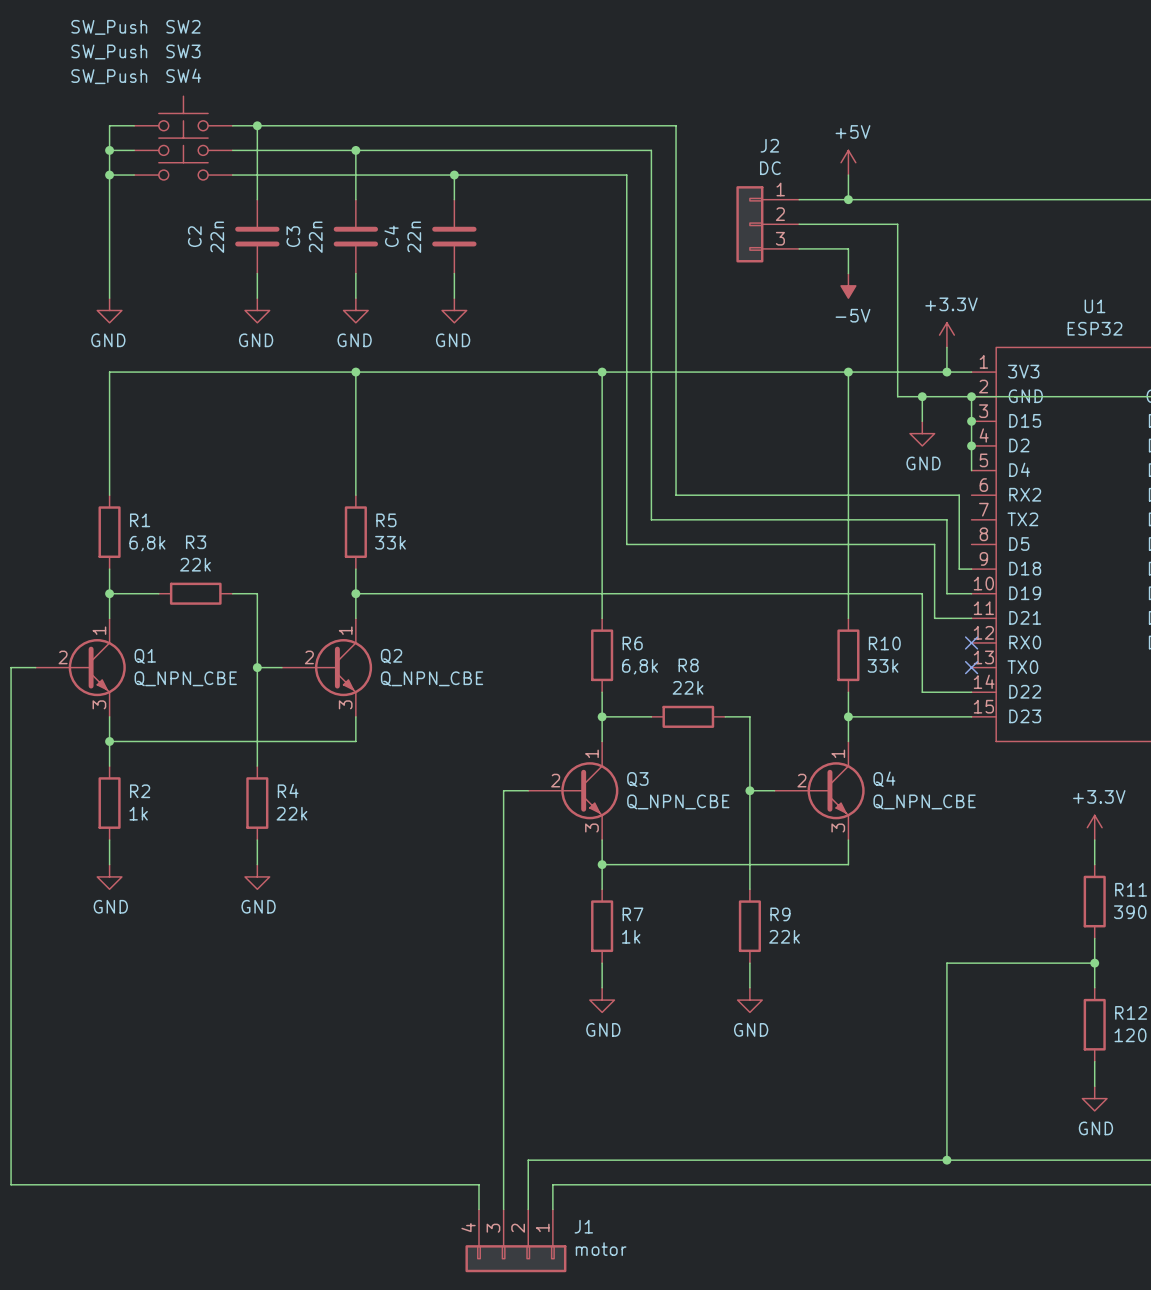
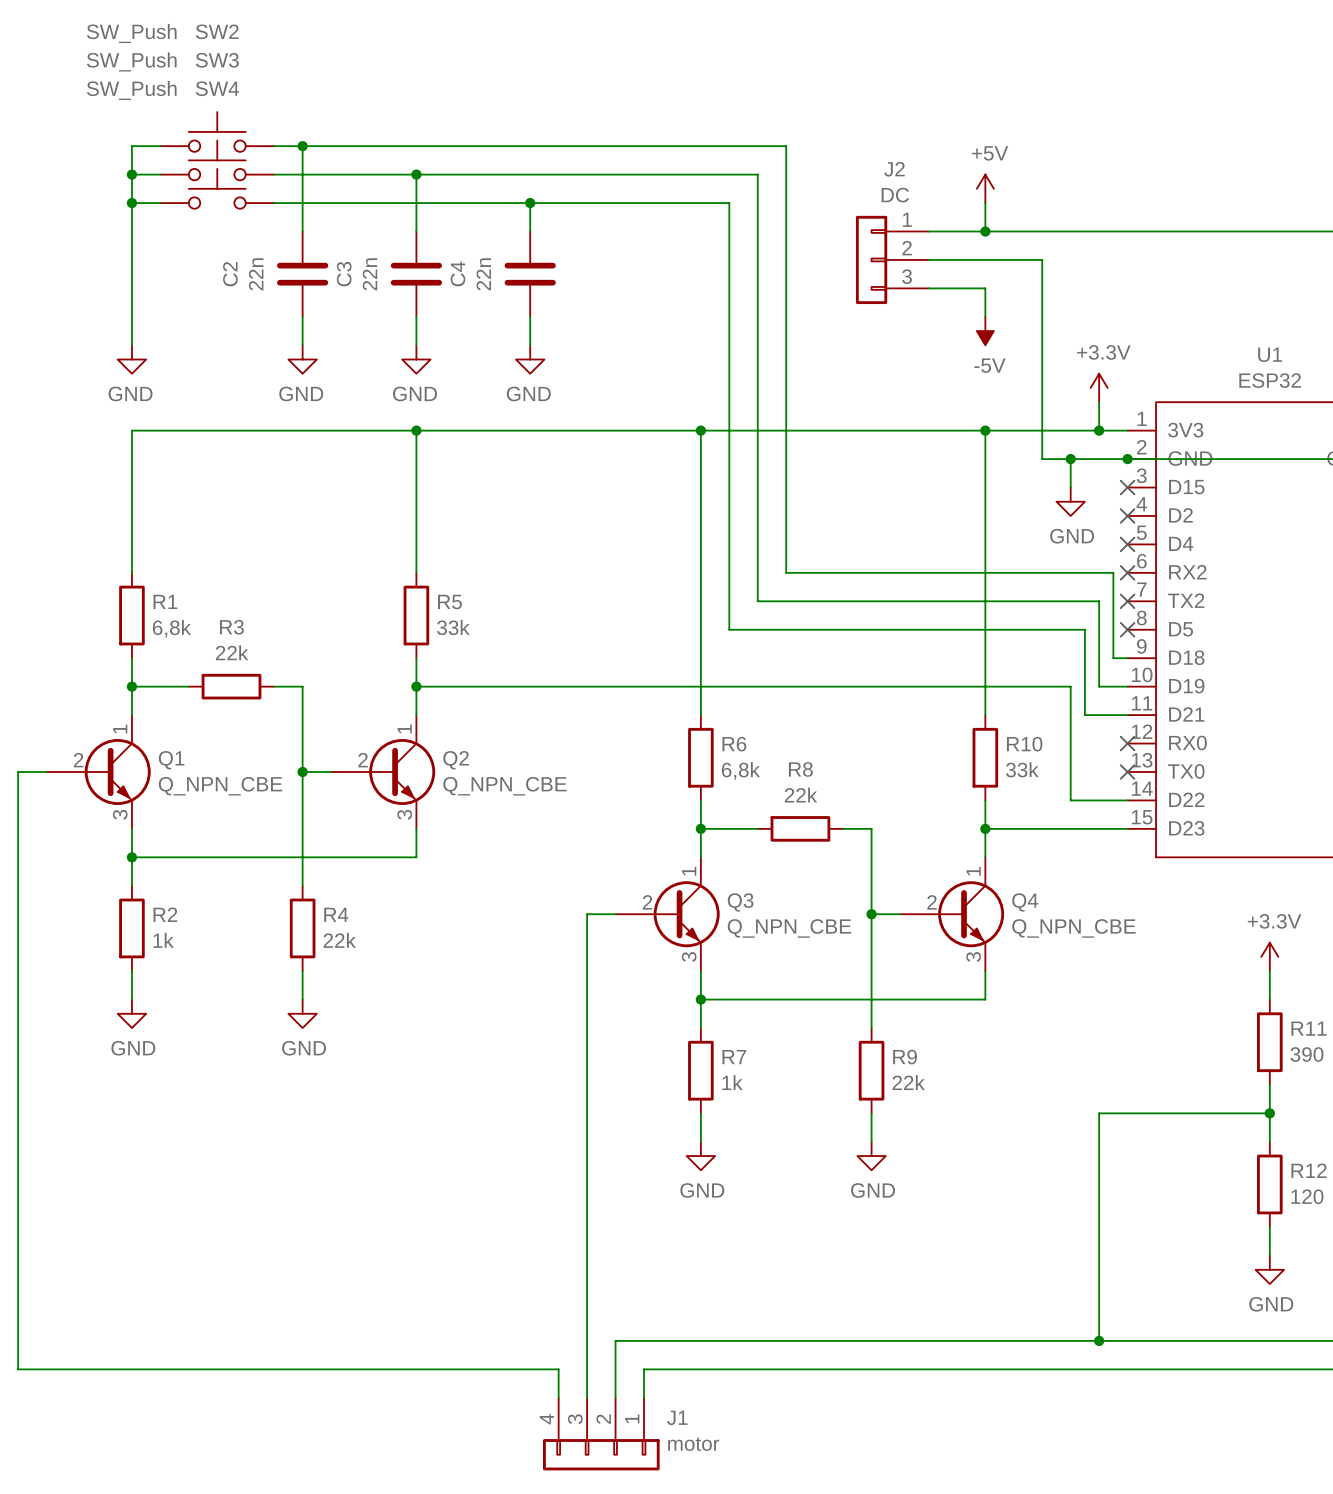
wire: (971, 396) (971, 470) -> none
junction: (971, 421) -> none
no-connect mark: none -> (1127, 487)
junction: (971, 445) -> none
no-connect mark: none -> (1127, 515)
no-connect mark: none -> (1127, 544)
no-connect mark: none -> (1127, 572)
no-connect mark: none -> (1127, 601)
no-connect mark: none -> (1127, 629)

